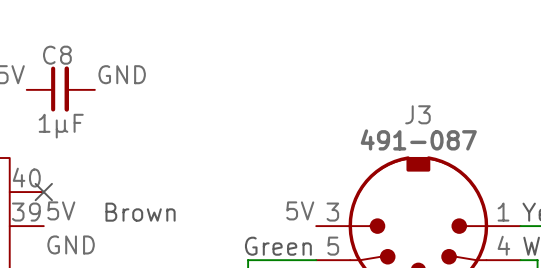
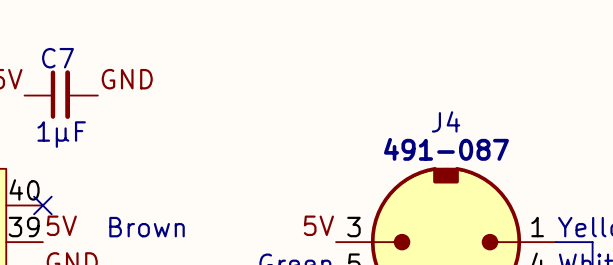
C8 name: C8 (57, 55) -> C7 (57, 58)
J3 name: J3 (417, 114) -> J4 (446, 121)

